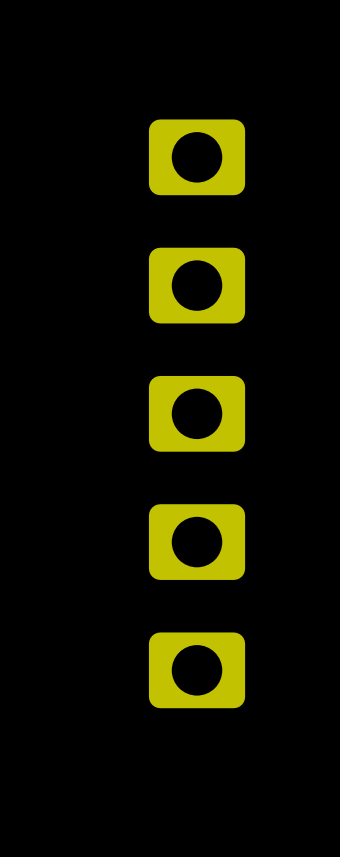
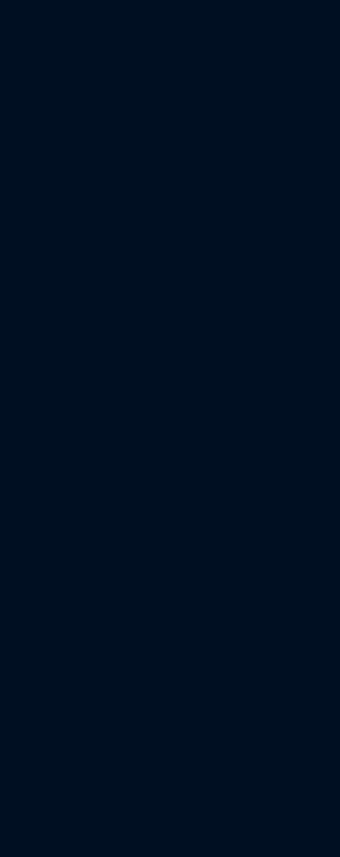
part: (197, 413) -> none

